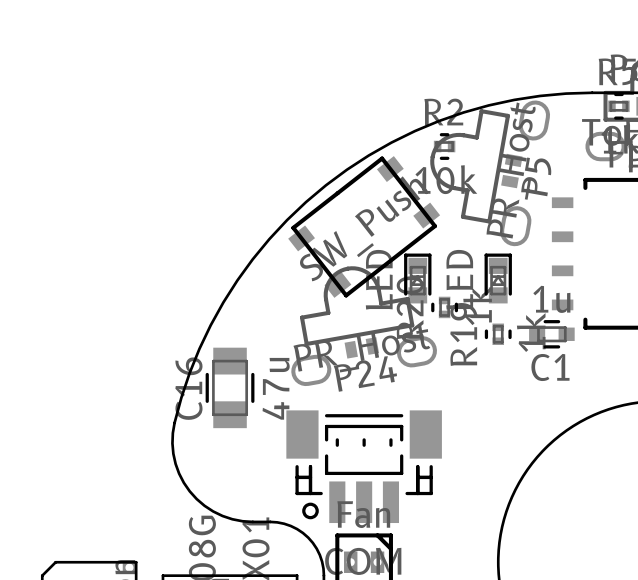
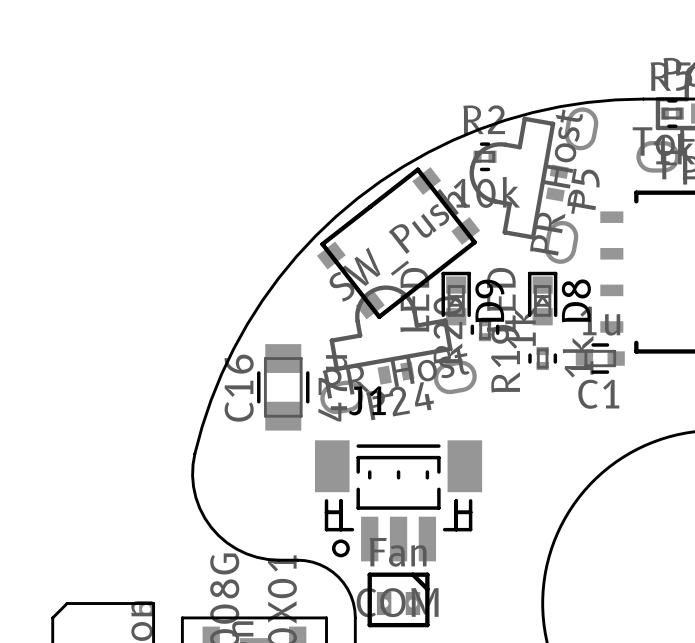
D9 name: none -> D9 (489, 300)
D8 name: none -> D8 (576, 300)
J1 name: none -> J1 (367, 400)
C16 position: (230, 387) -> (283, 387)

